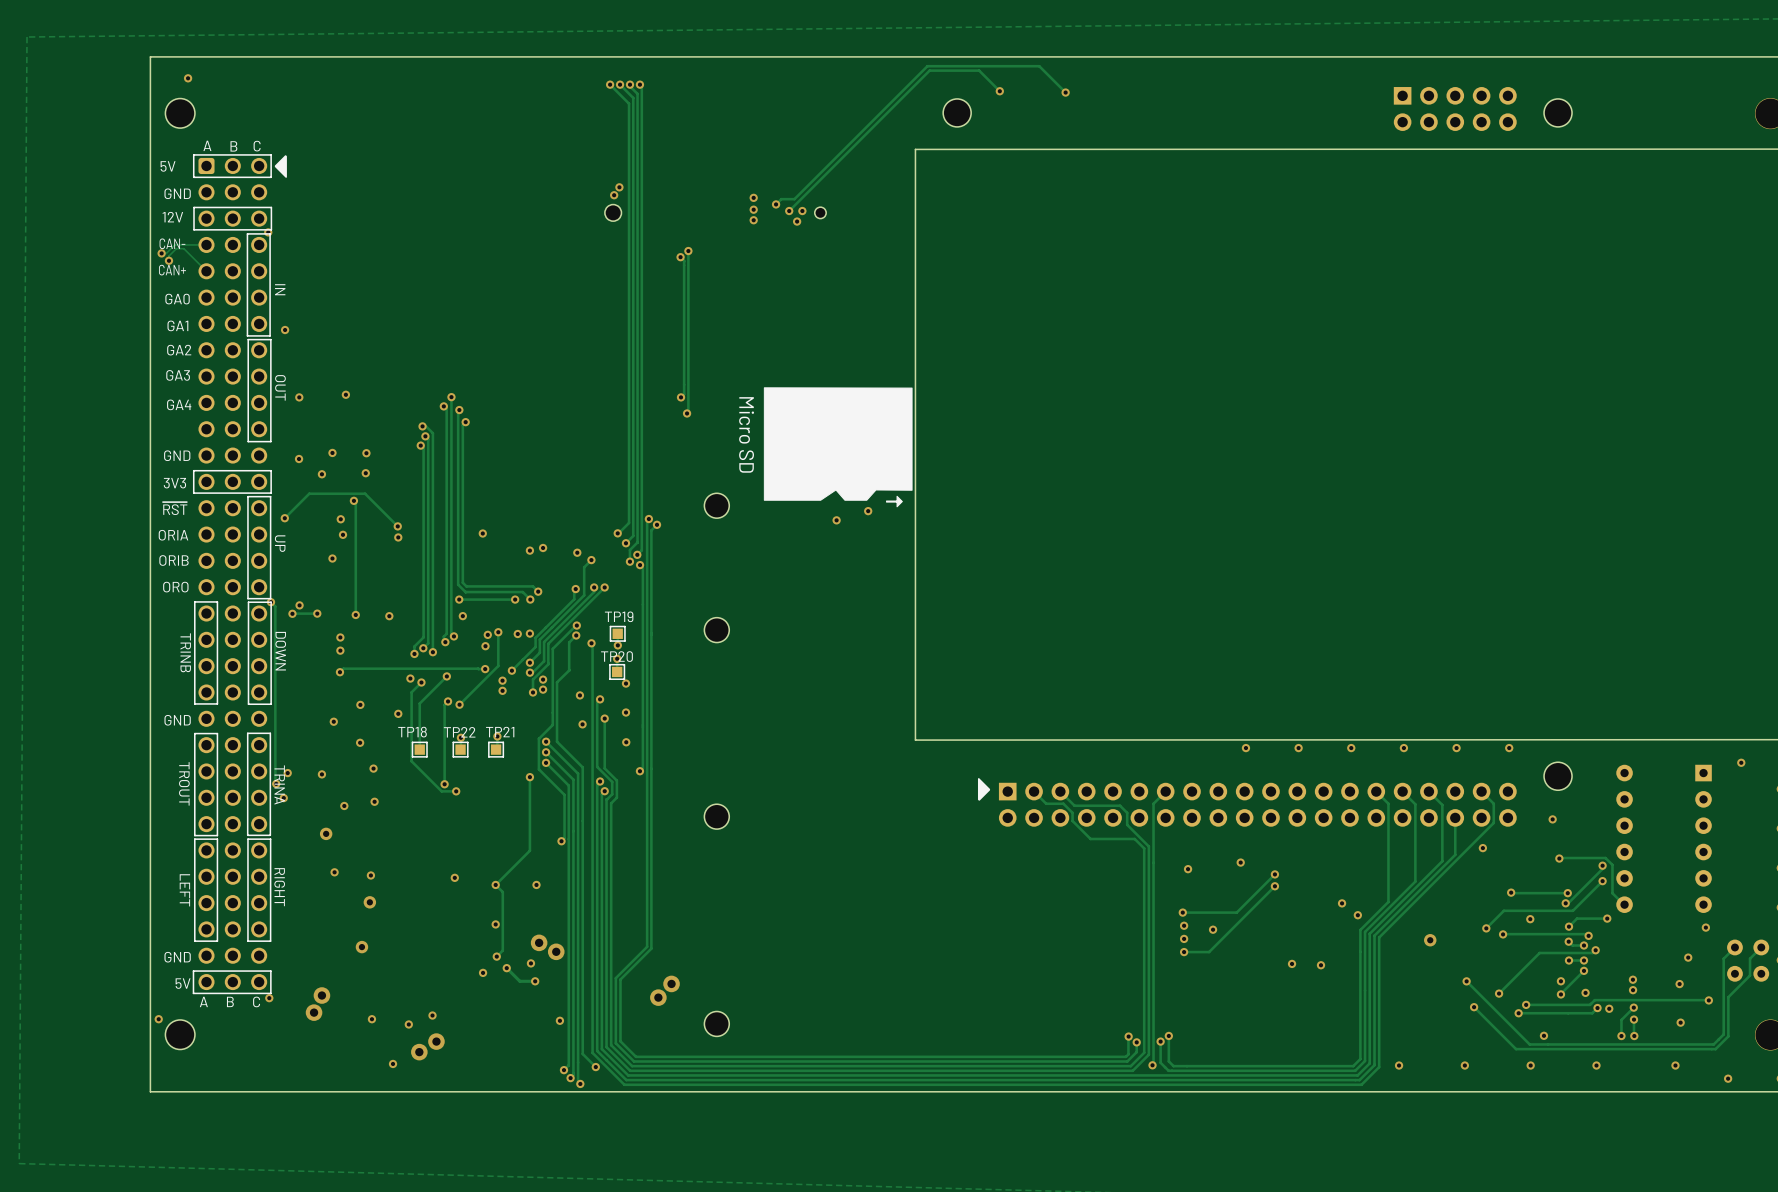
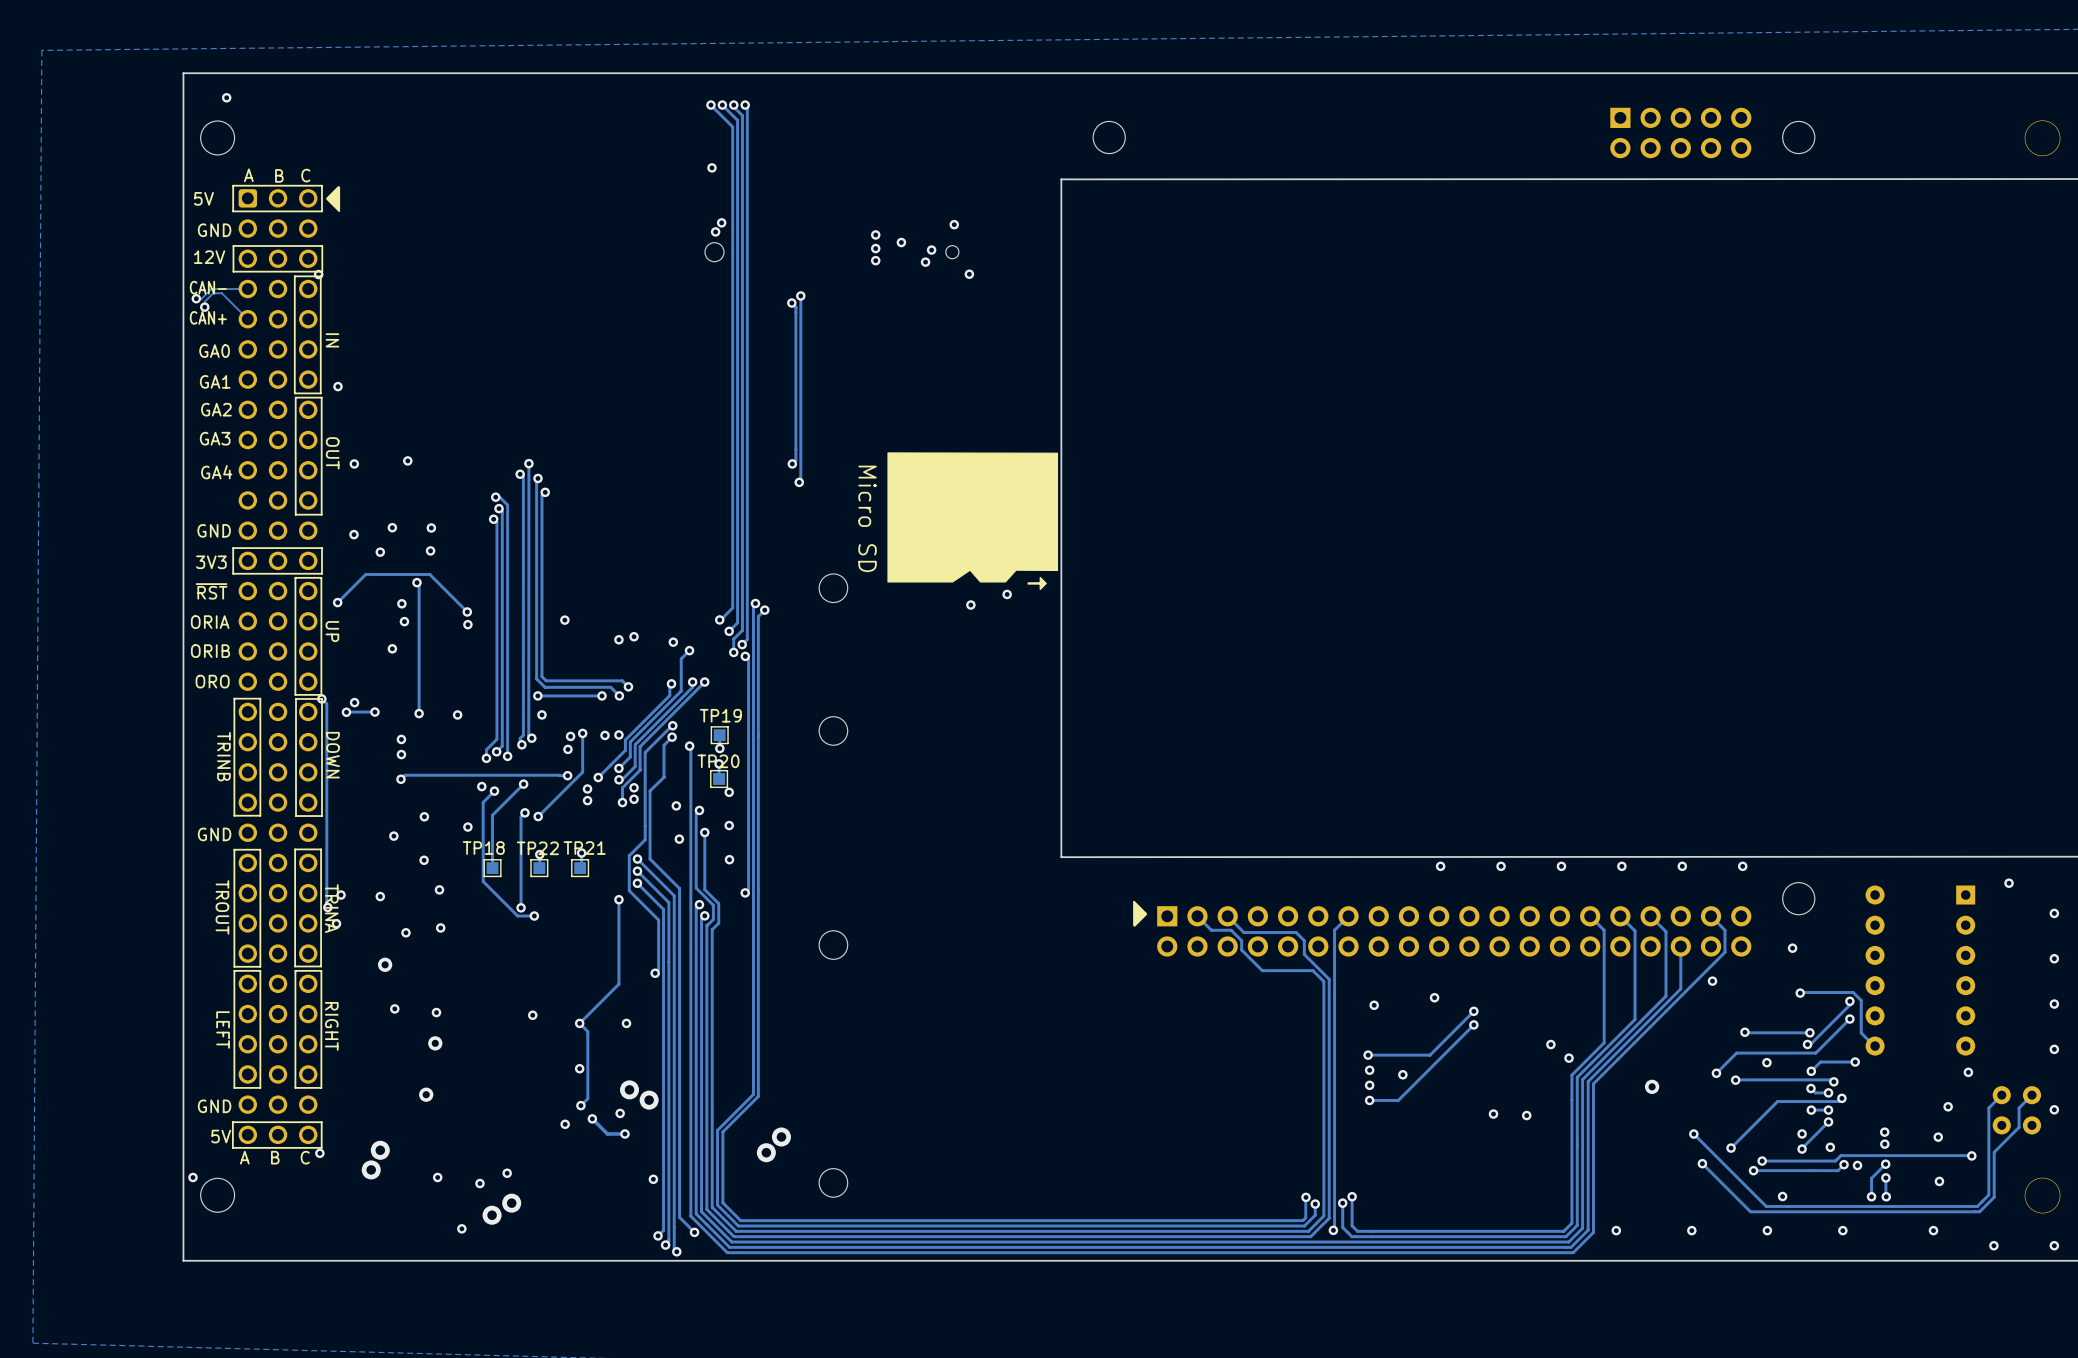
track: (999, 91) (979, 70) (929, 70) (789, 211) -> none
via: (999, 91) -> none
track: (1065, 92) (1039, 66) (927, 66) (794, 199) (781, 199) (776, 204) -> none
via: (1065, 92) -> none
via: none -> (711, 167)
via: none -> (954, 224)
via: (789, 211) -> none
via: none -> (969, 274)

